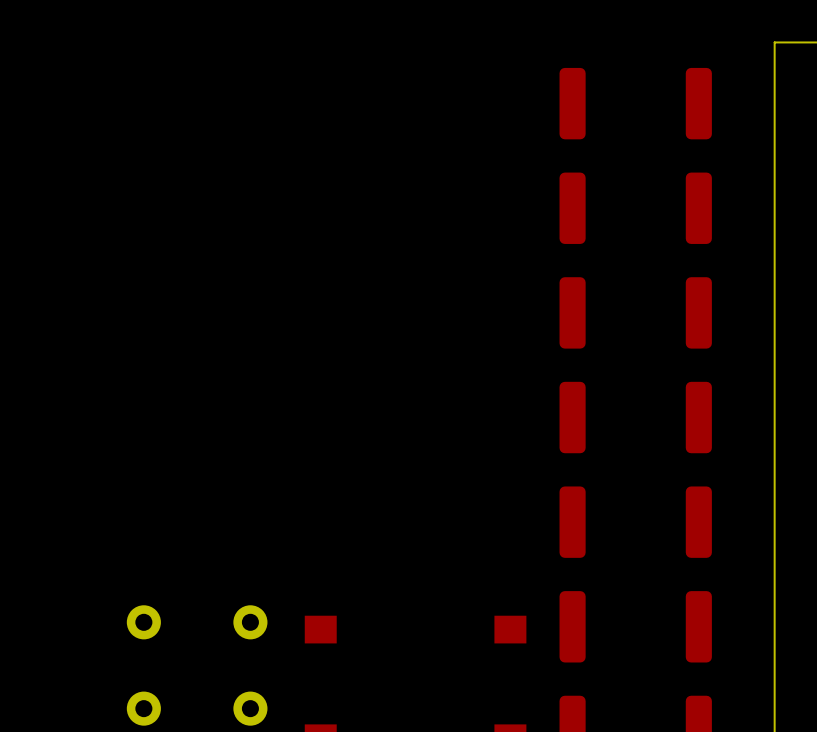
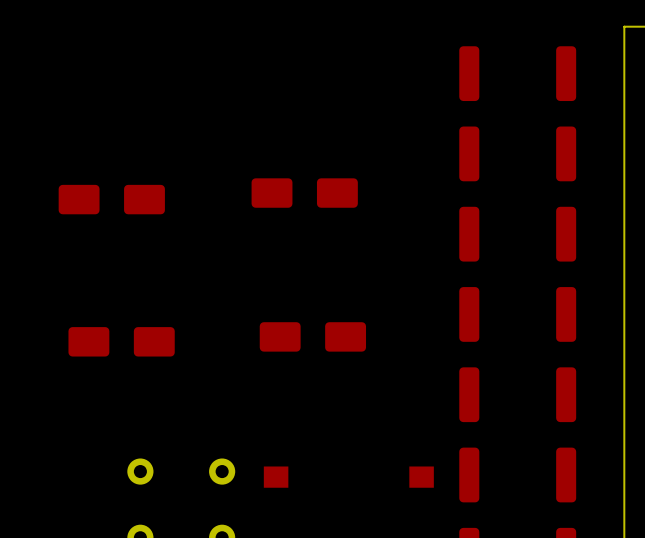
part: none -> (304, 193)
part: none -> (111, 199)
part: none -> (312, 336)
part: none -> (121, 341)

